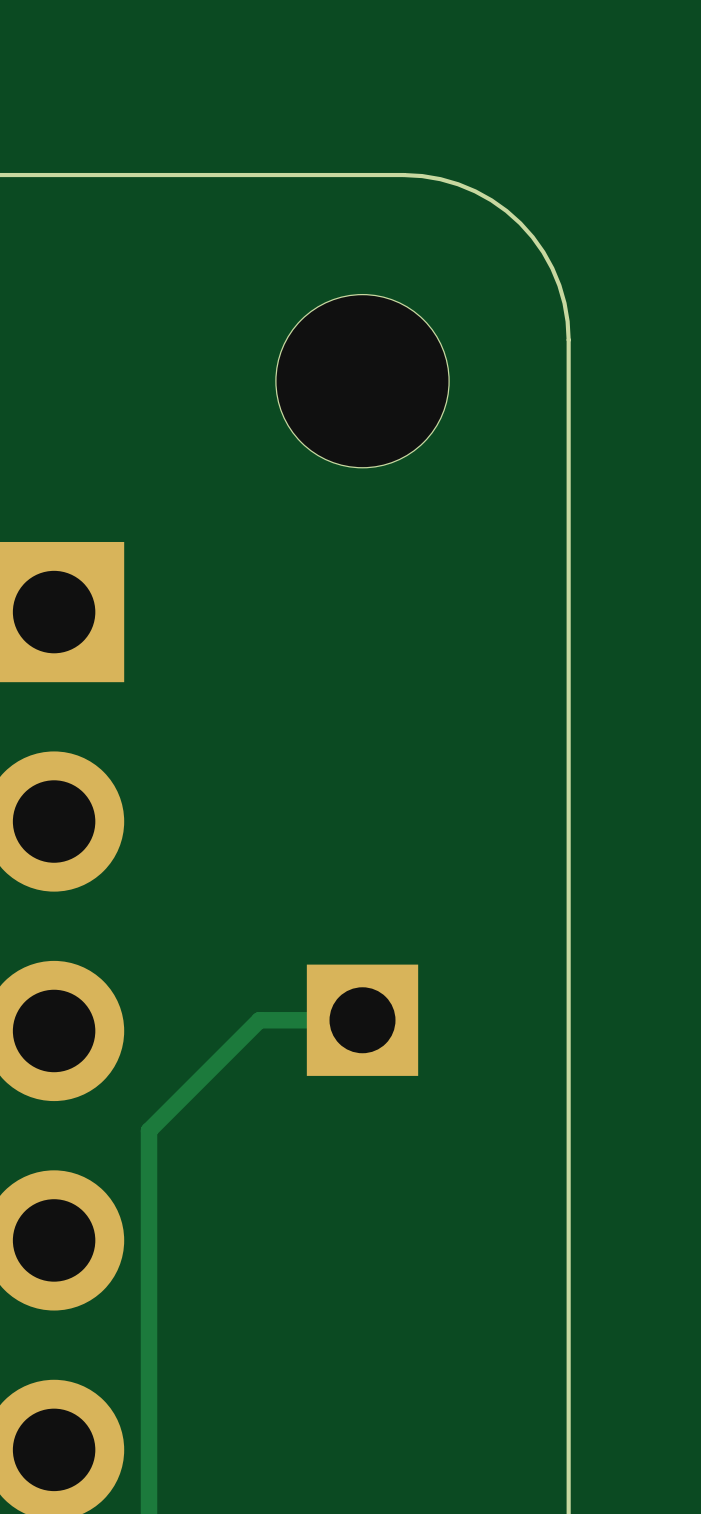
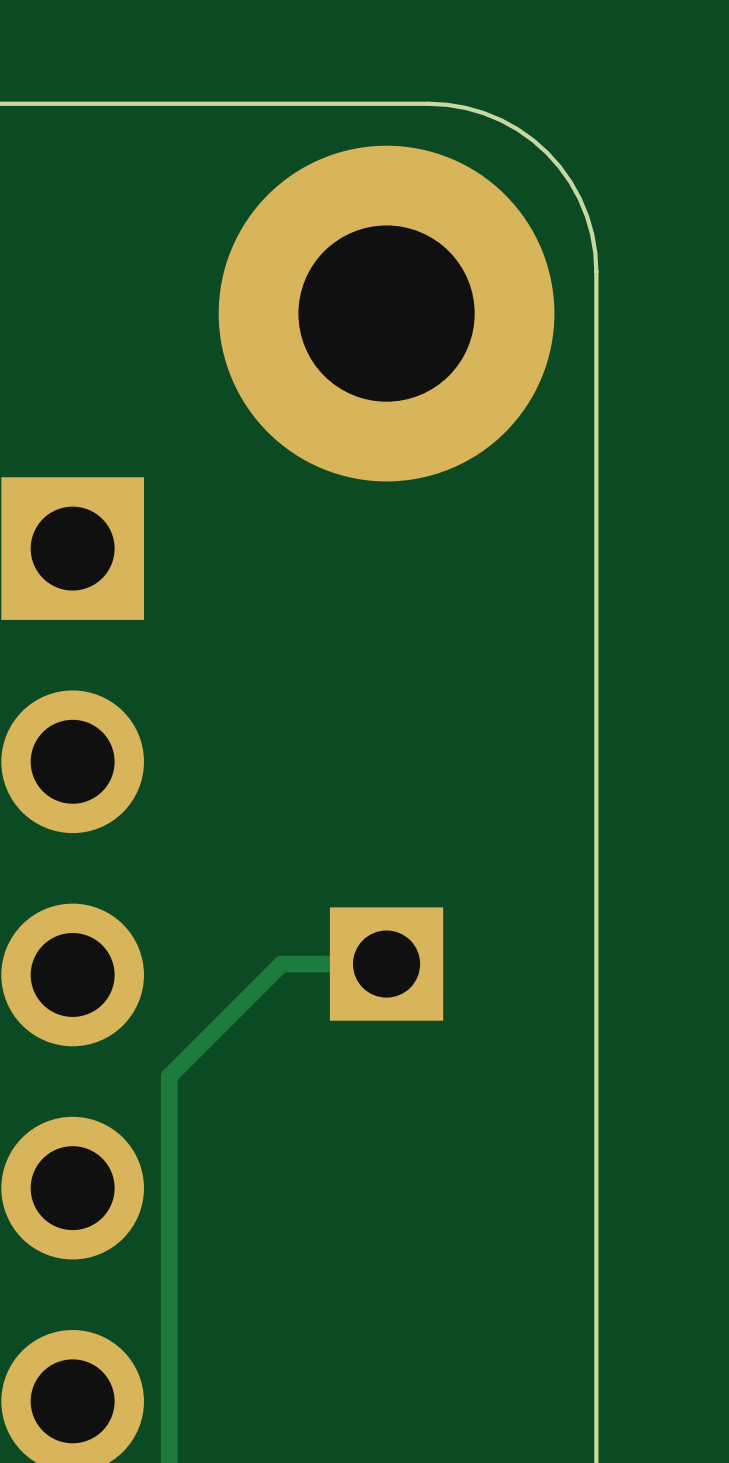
part footprint: [275, 294, 450, 468] -> [218, 145, 555, 482]

